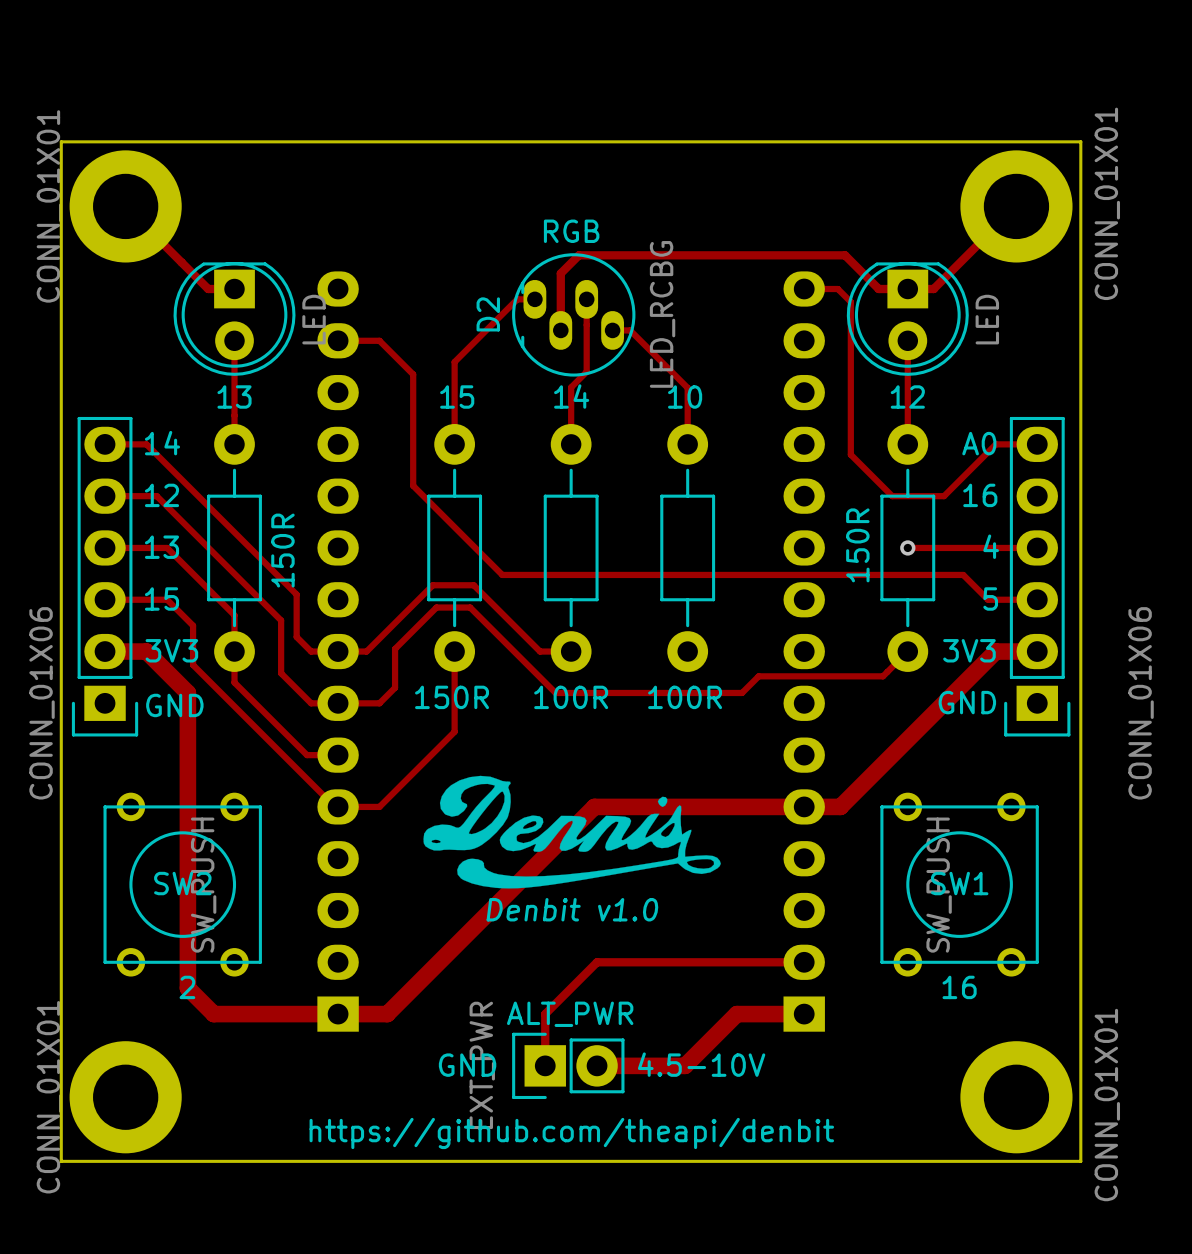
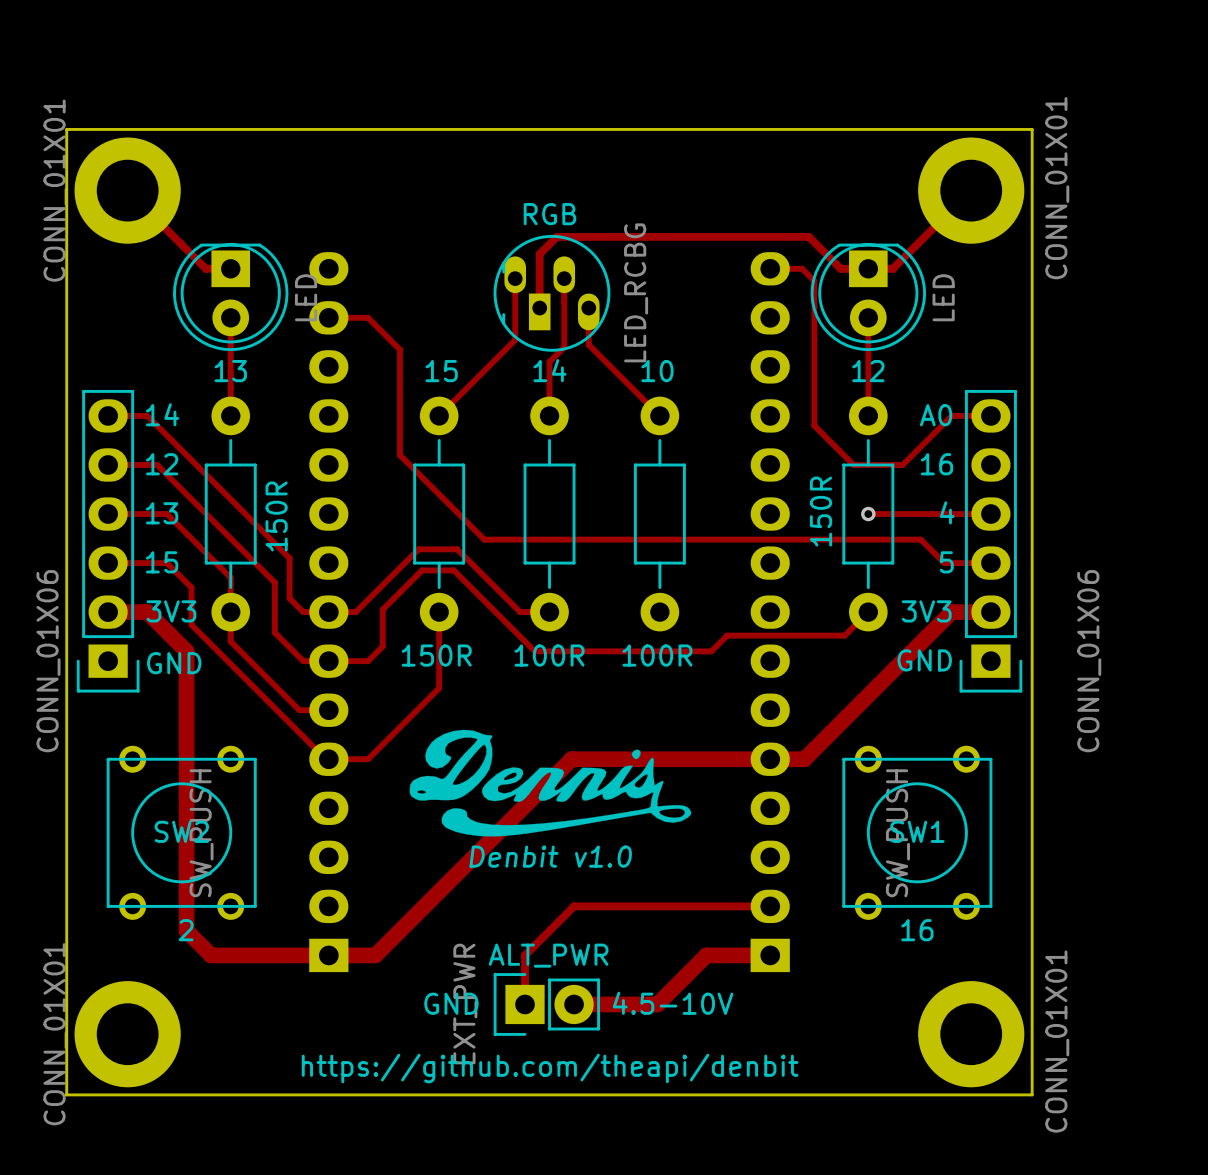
track: (534, 299) (517, 299) (454, 362) (454, 444) -> (515, 278) (515, 339) (439, 415)
D2: LED_RCBG (573, 314) -> none
part: none -> LED_RCBG (551, 293)
track: (612, 330) (630, 330) (687, 387) (687, 444) -> (588, 308) (588, 344) (659, 415)

